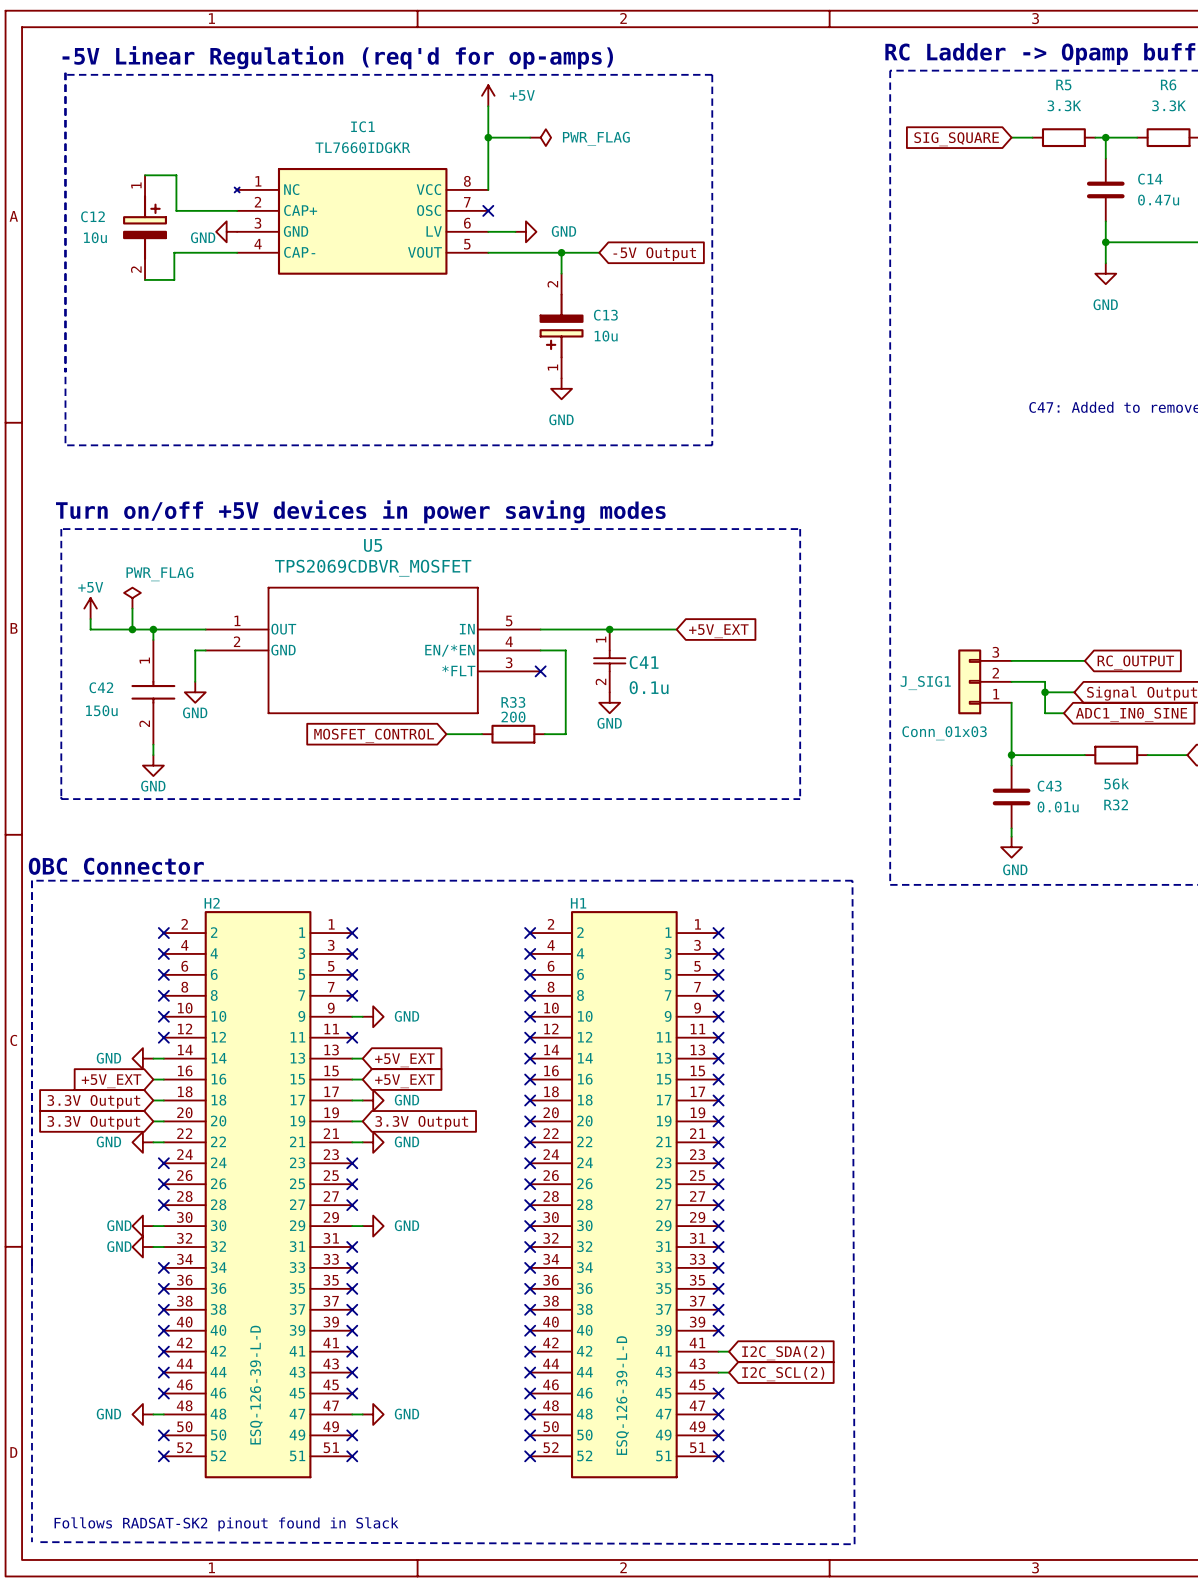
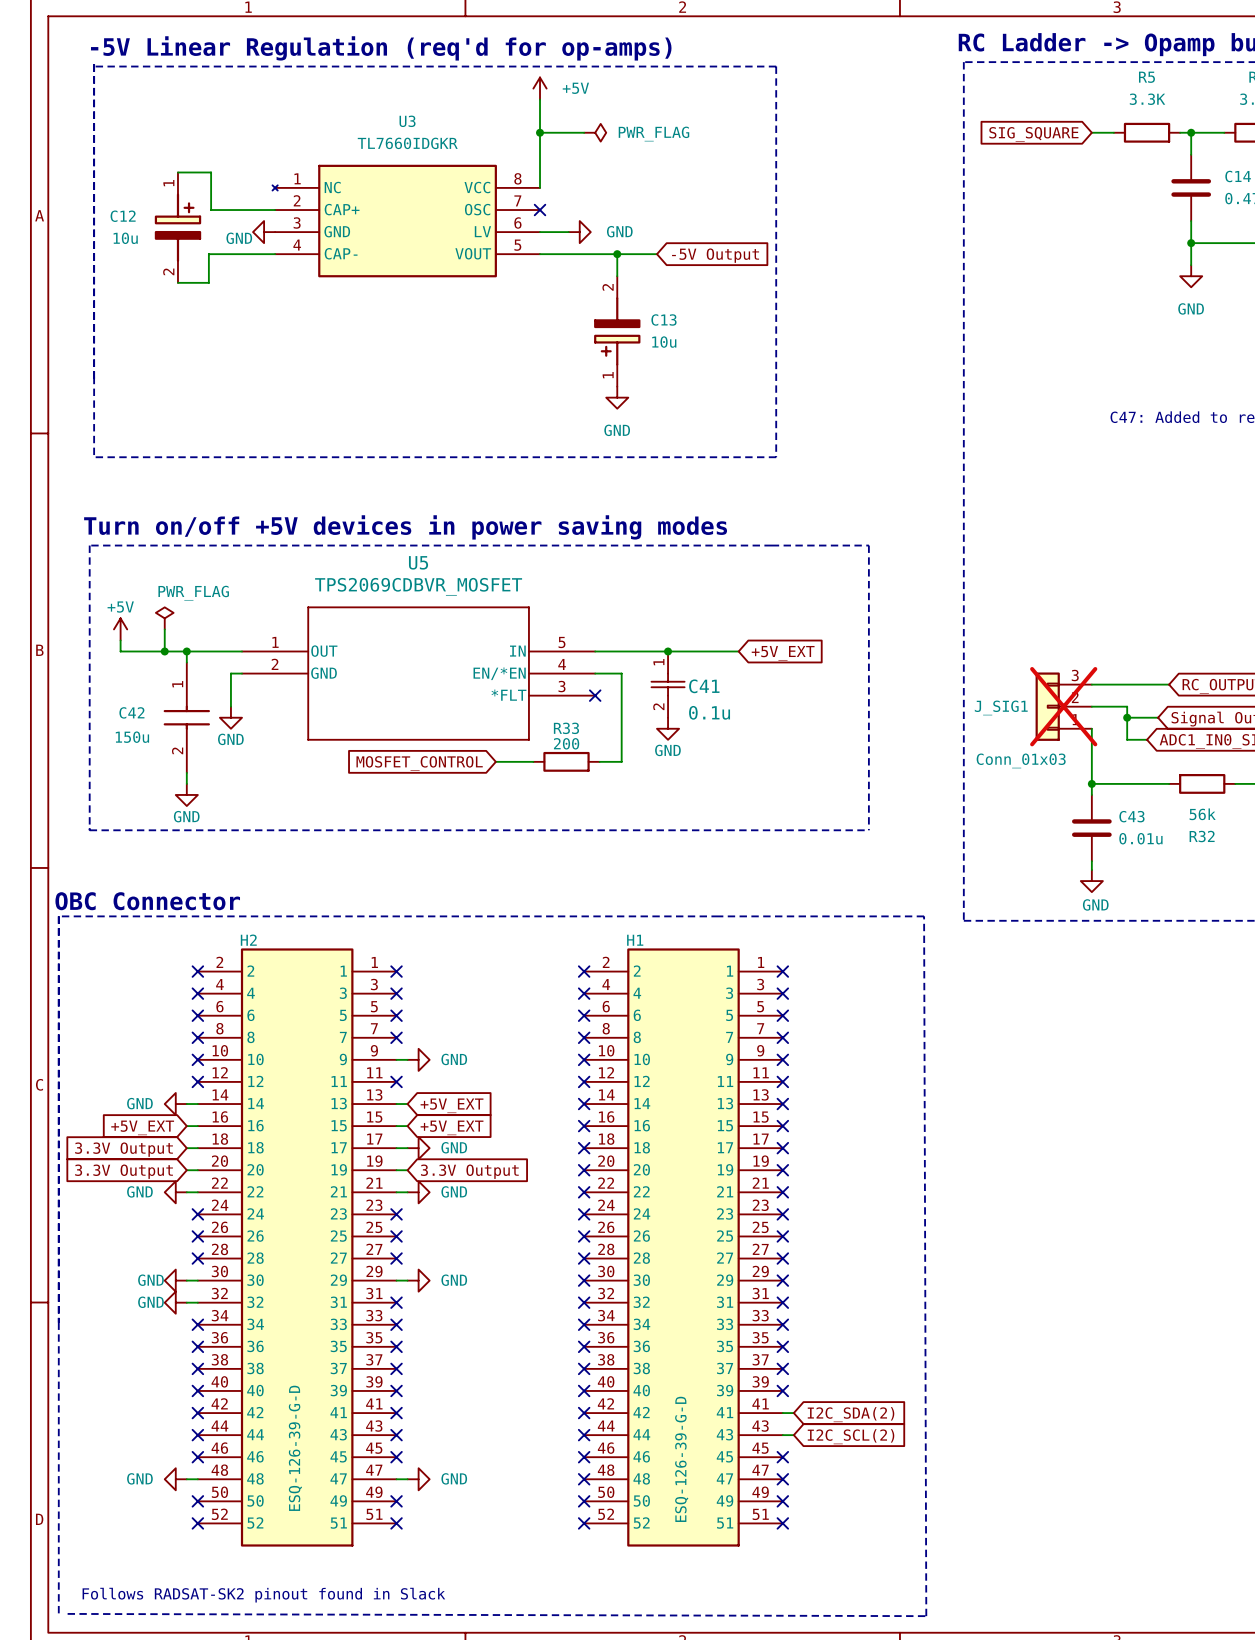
IC1 name: IC1 (362, 126) -> U3 (407, 121)
J_SIG1 do-not-place cross: none -> (1063, 706)
H2 value: ESQ-126-39-L-D (256, 1385) -> ESQ-126-39-G-D (295, 1448)
H1 value: ESQ-126-39-L-D (622, 1395) -> ESQ-126-39-G-D (681, 1459)

